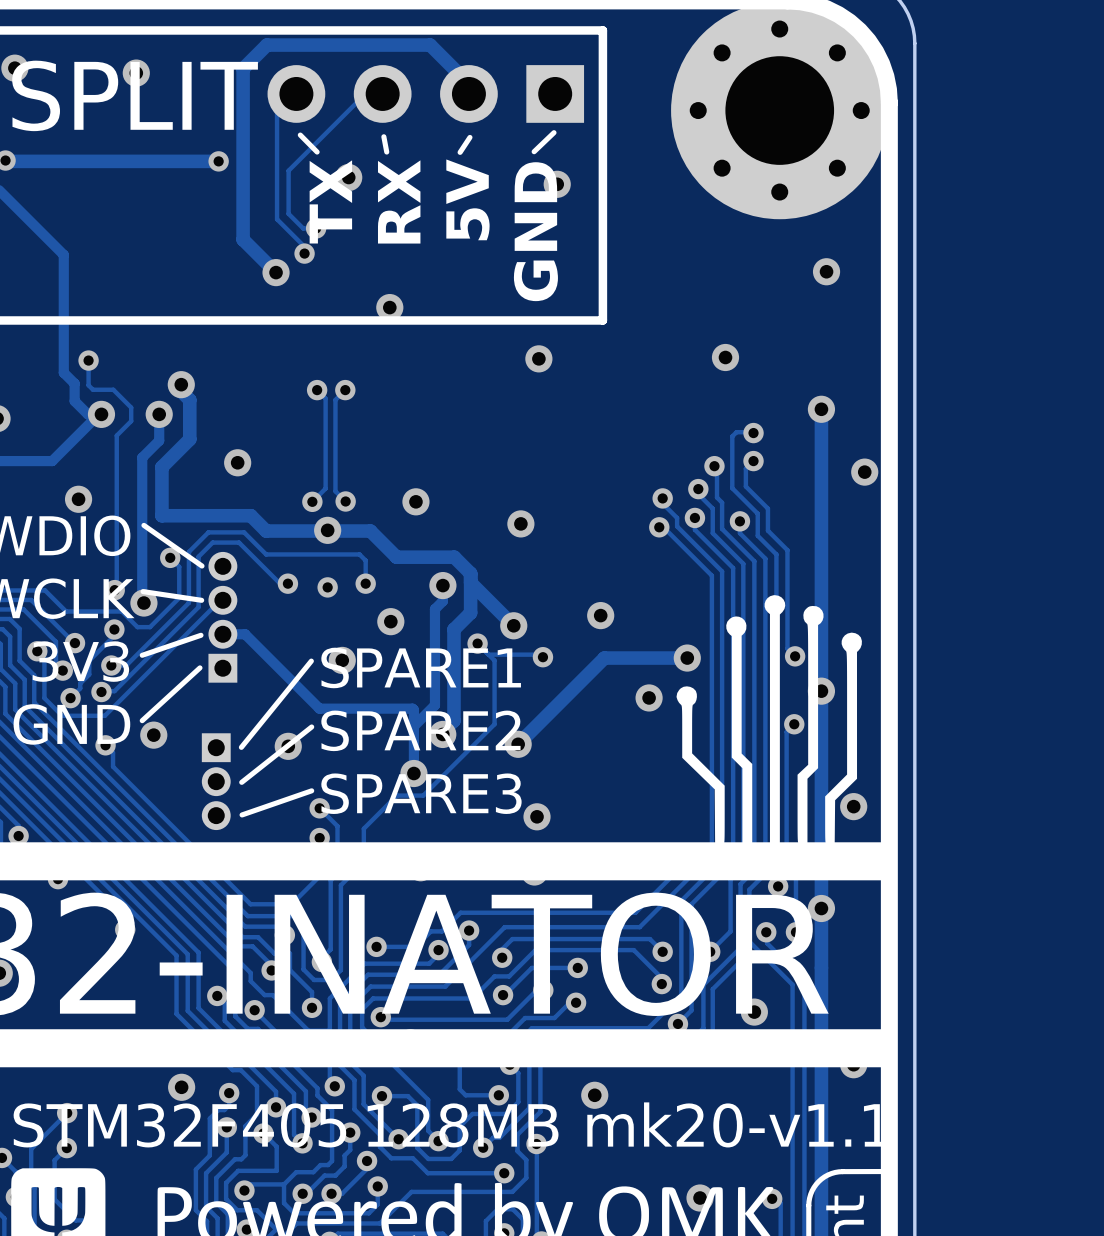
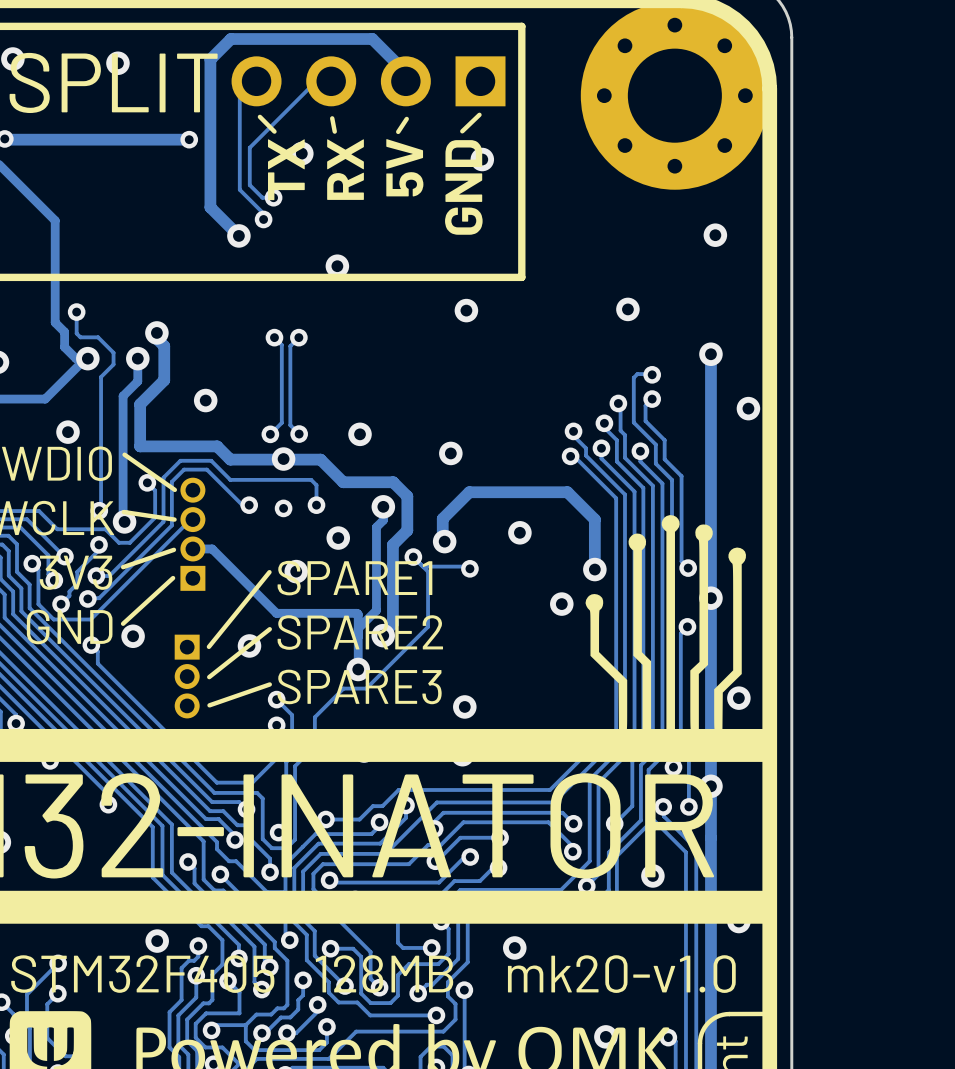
track: (470, 582) (513, 625) -> none
track: (687, 658) (604, 658) (518, 744) -> (594, 569) (594, 519) (567, 492) (469, 492) (442, 518) (442, 544)
via: (518, 744) -> none
text: mk20-v1.1 (738, 1124) -> mk20-v1.0 (621, 974)

